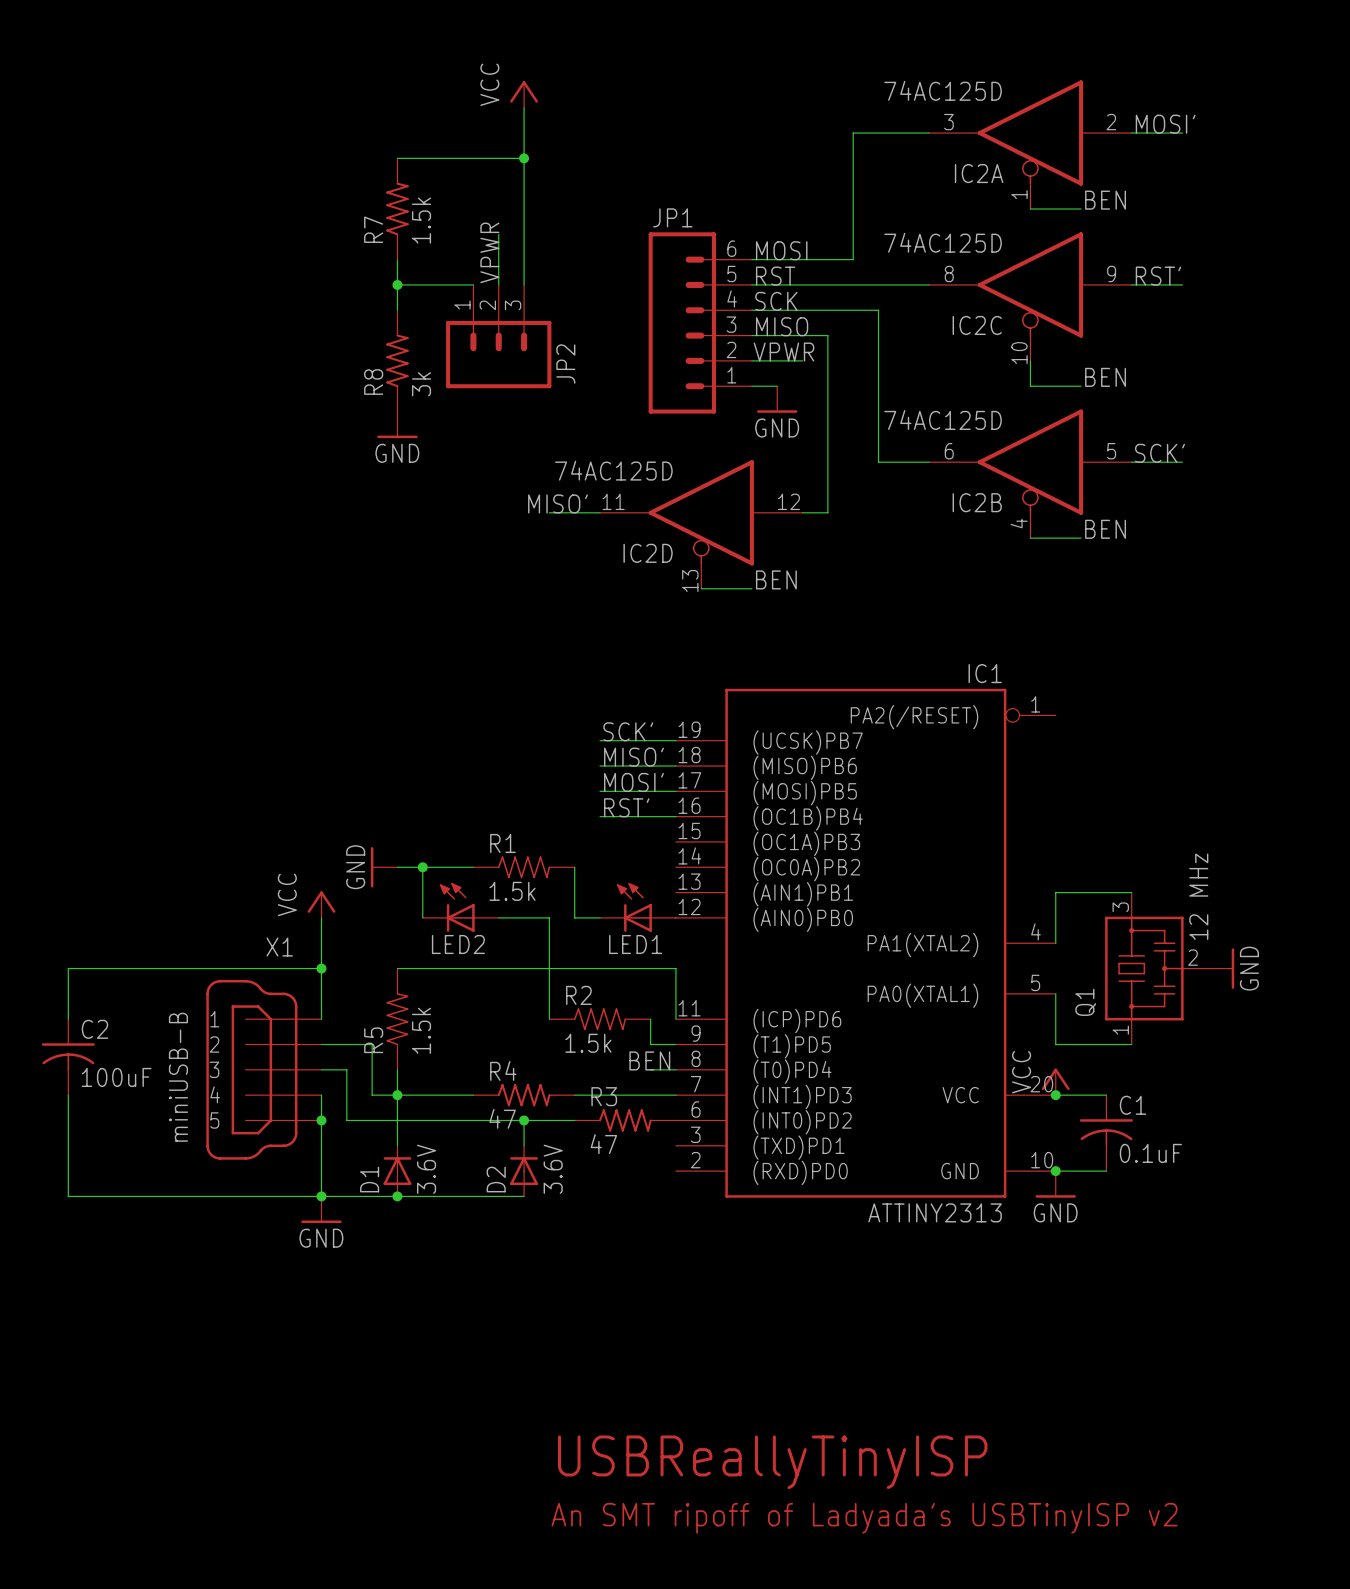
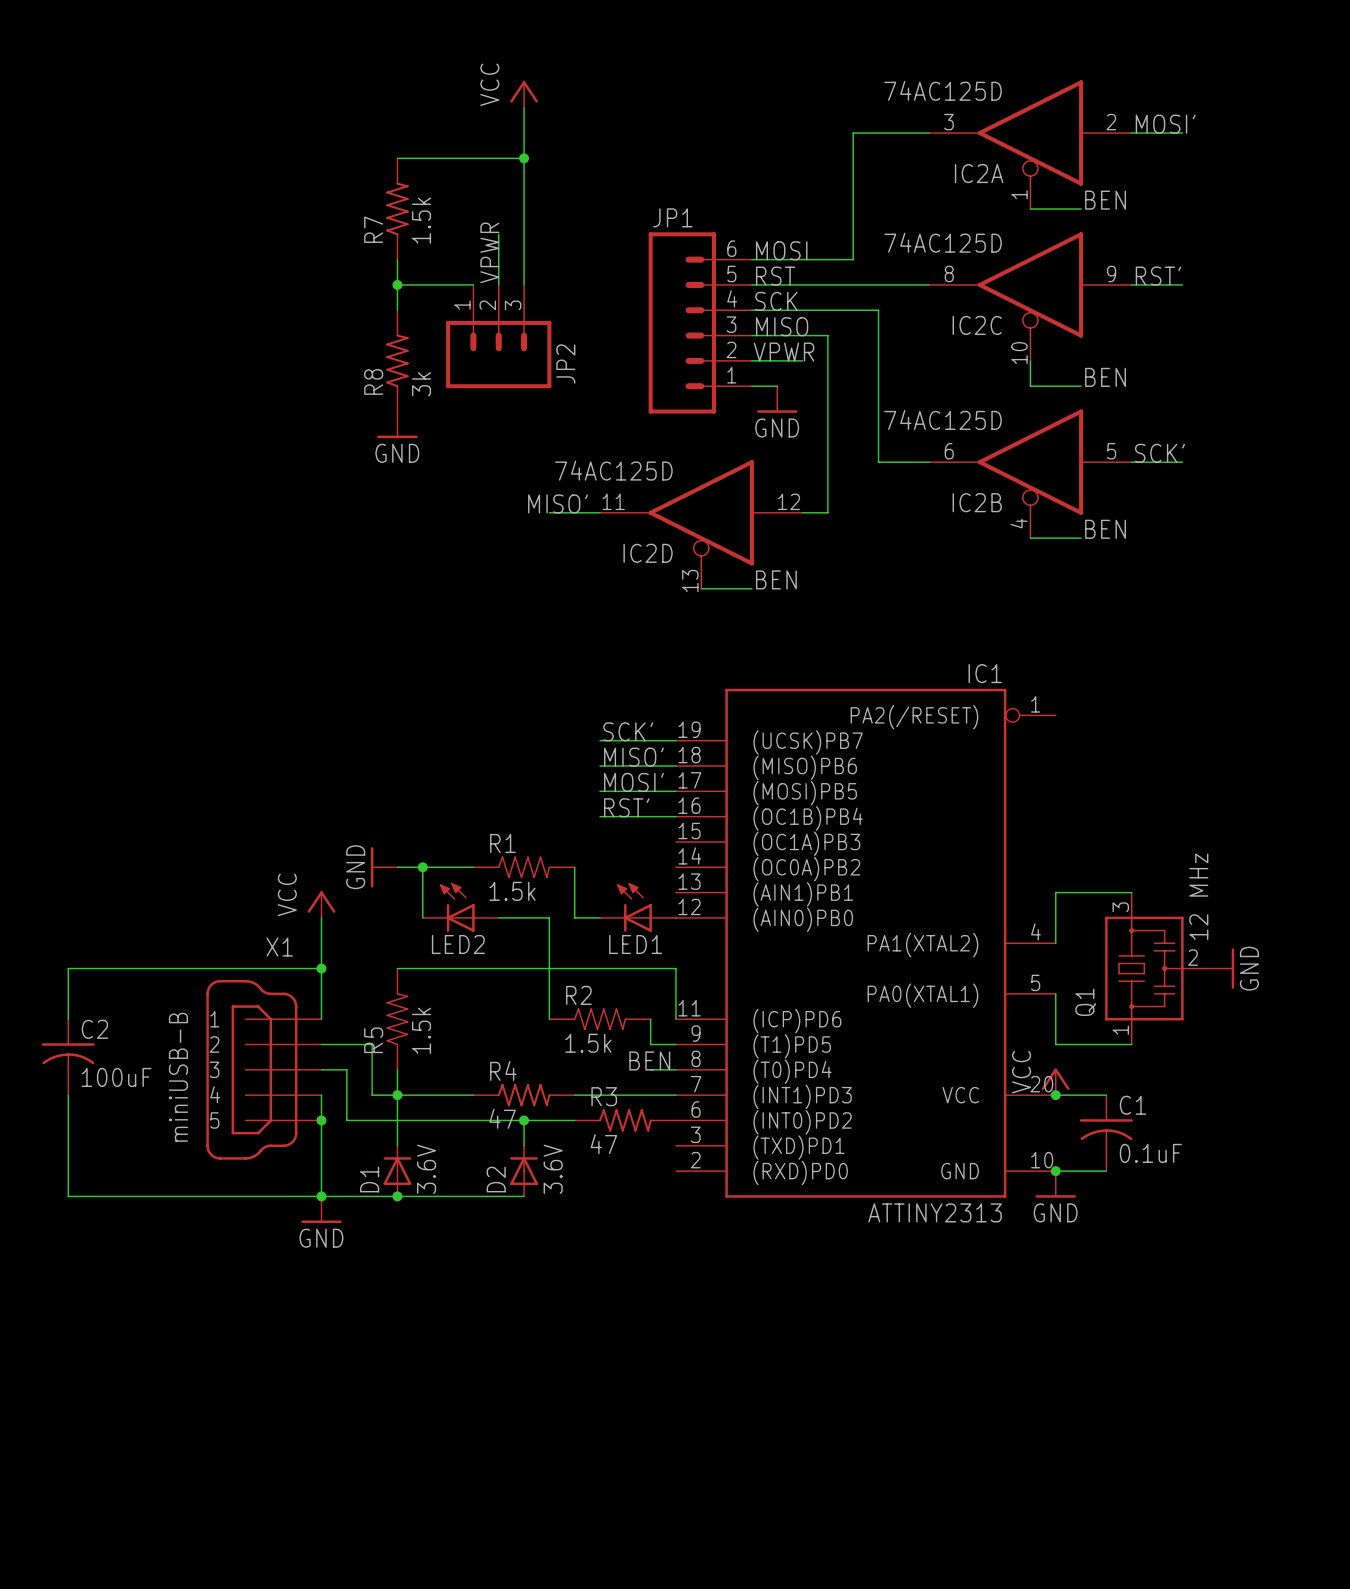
text: USBReallyTinyISP (772, 1462) -> none
text: An SMT ripoff of Ladyada's USBTinyISP v2 (864, 1518) -> none

